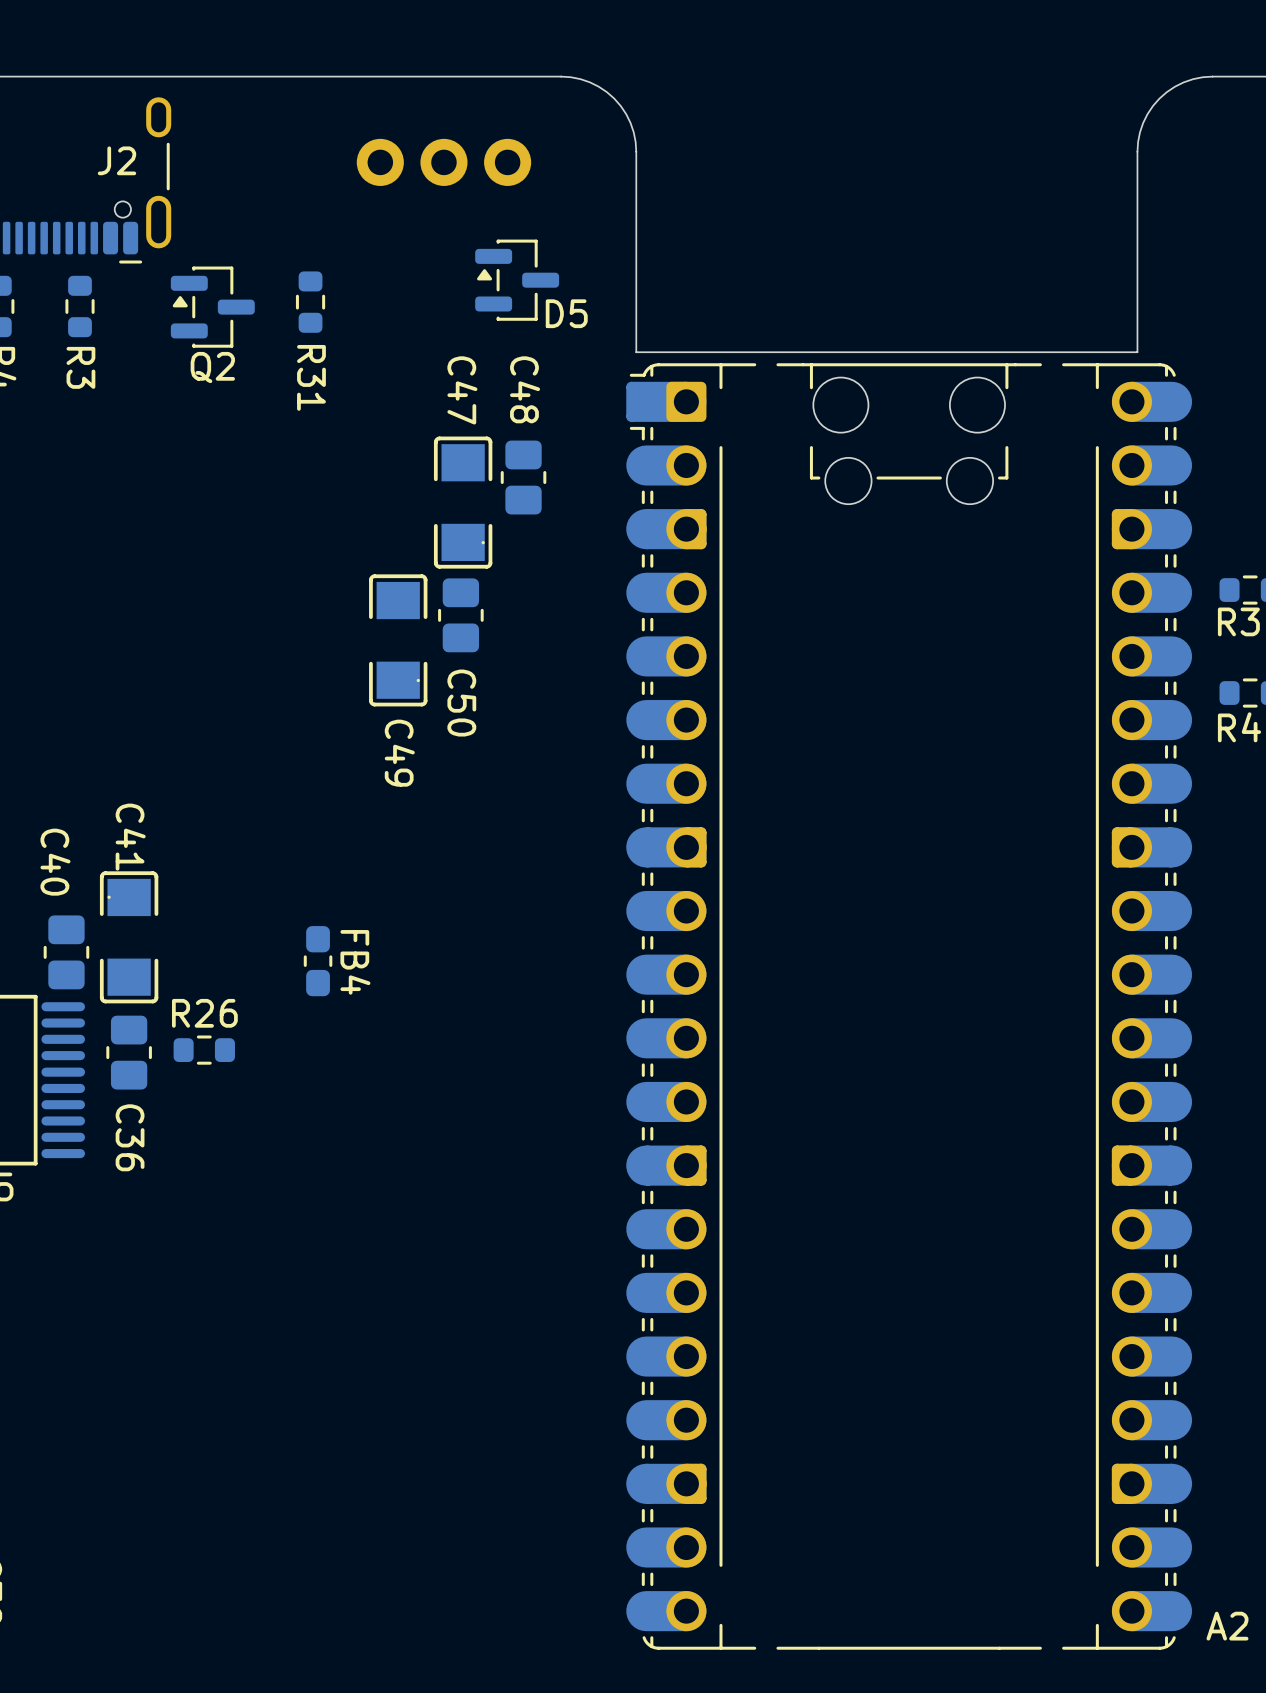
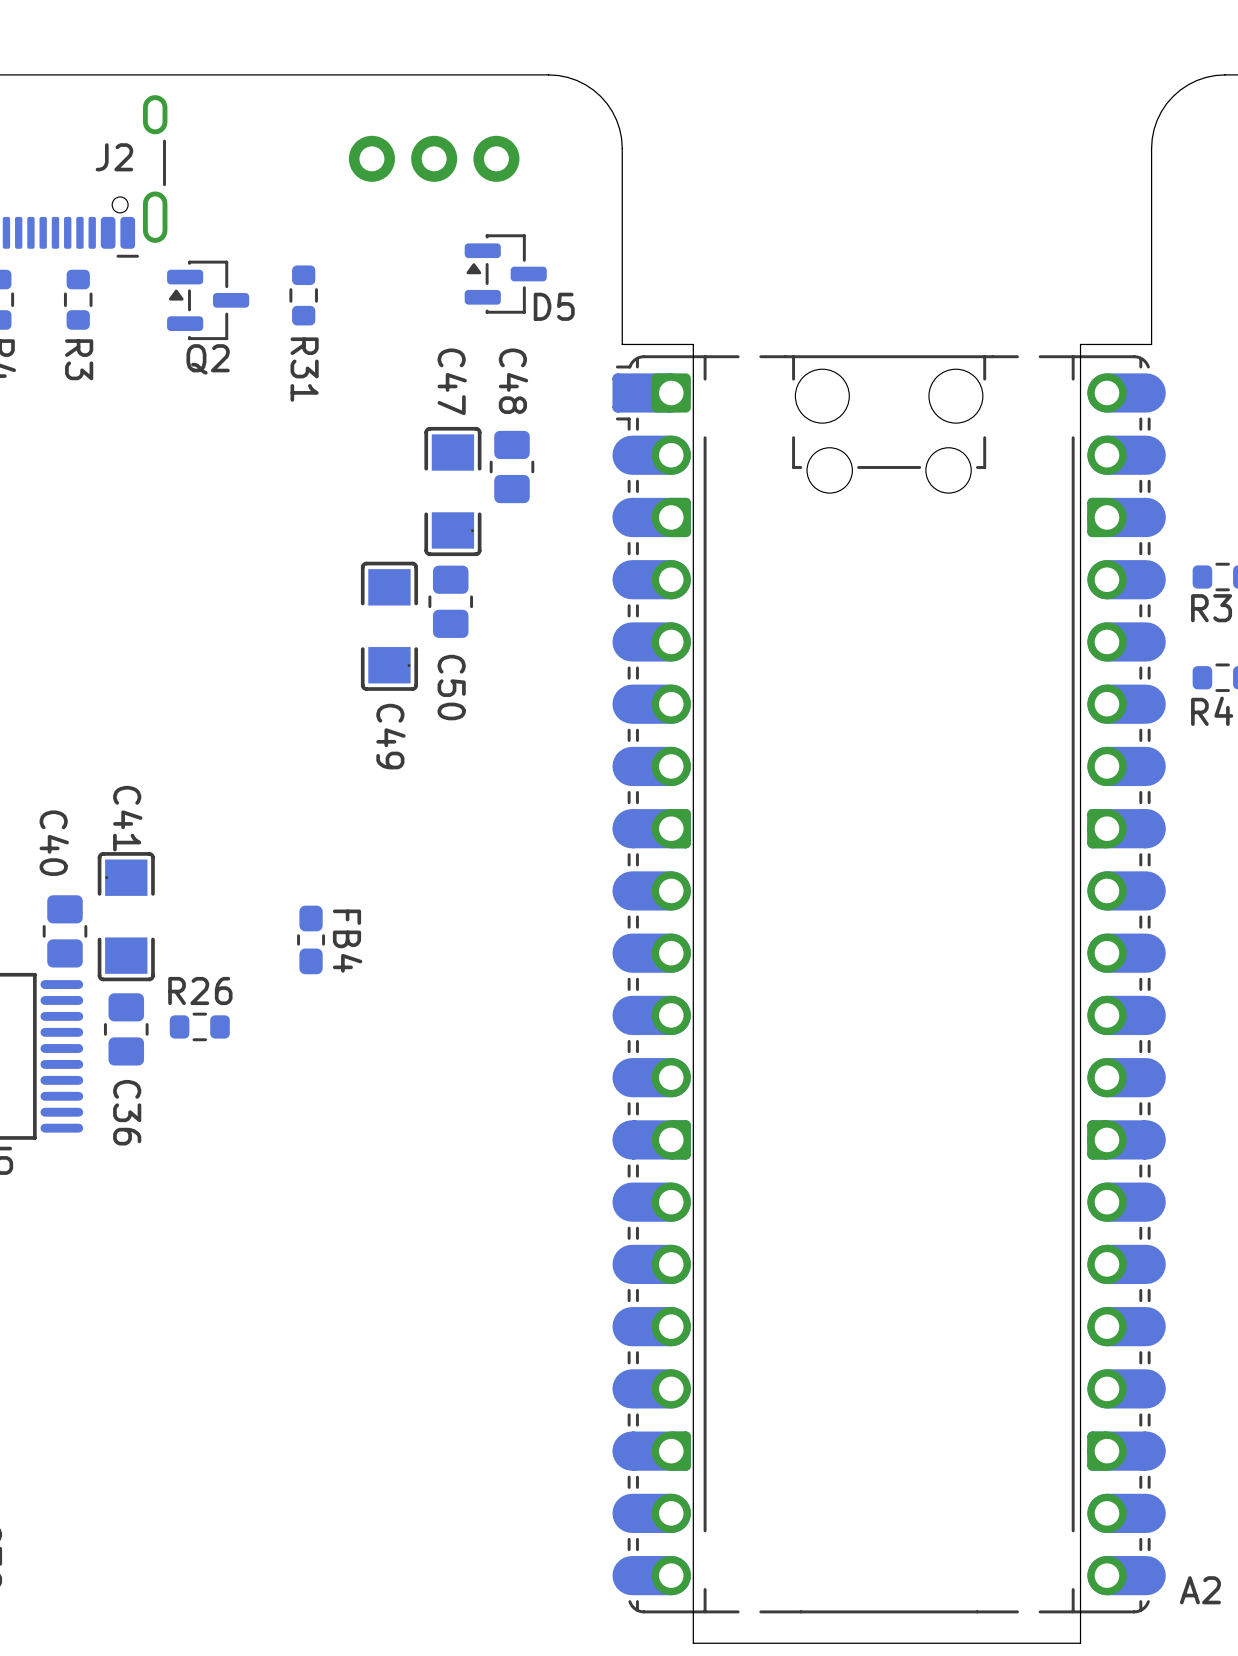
board edge: (1252, 76) (1202, 77) (1183, 82) (1159, 98) (1143, 122) (1137, 151) (1137, 352) -> (1225, 74) (1206, 77) (1188, 84) (1173, 96) (1157, 120) (1151, 148) (1151, 344) (1112, 344)
board edge: (1104, 352) (708, 352) -> (1080, 344) (1080, 1643) (693, 1643) (693, 344)

